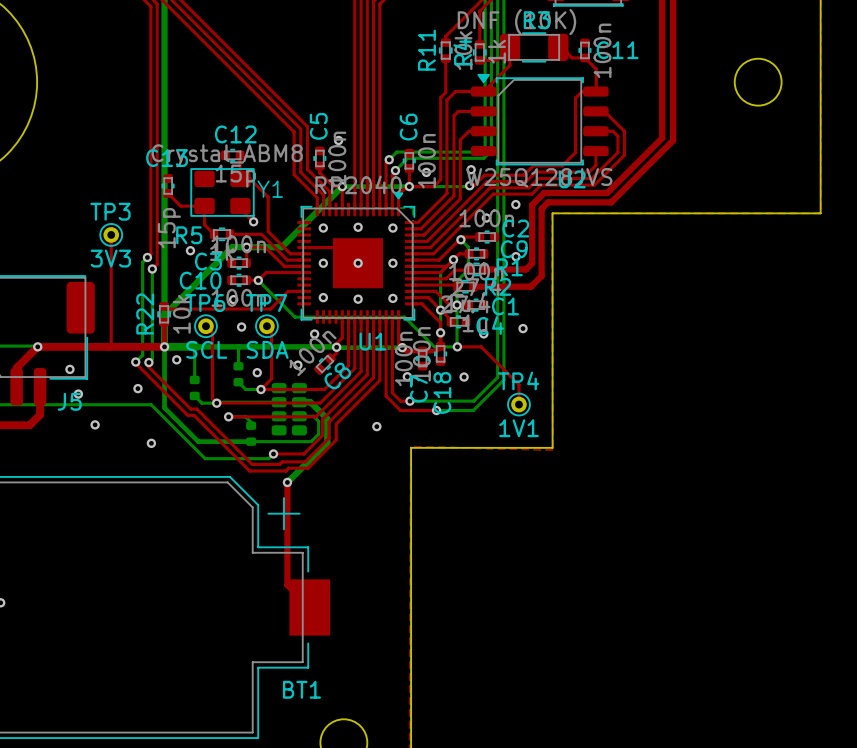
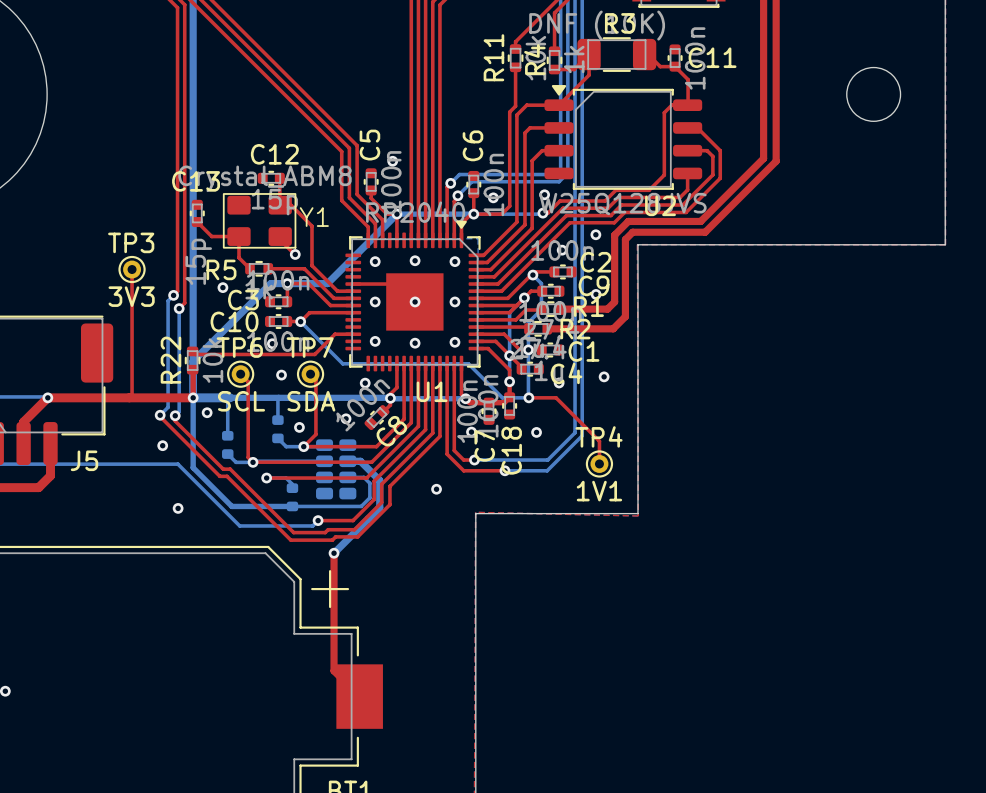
via: (69, 369) -> none
via: (78, 394) -> none
via: (95, 424) -> none

